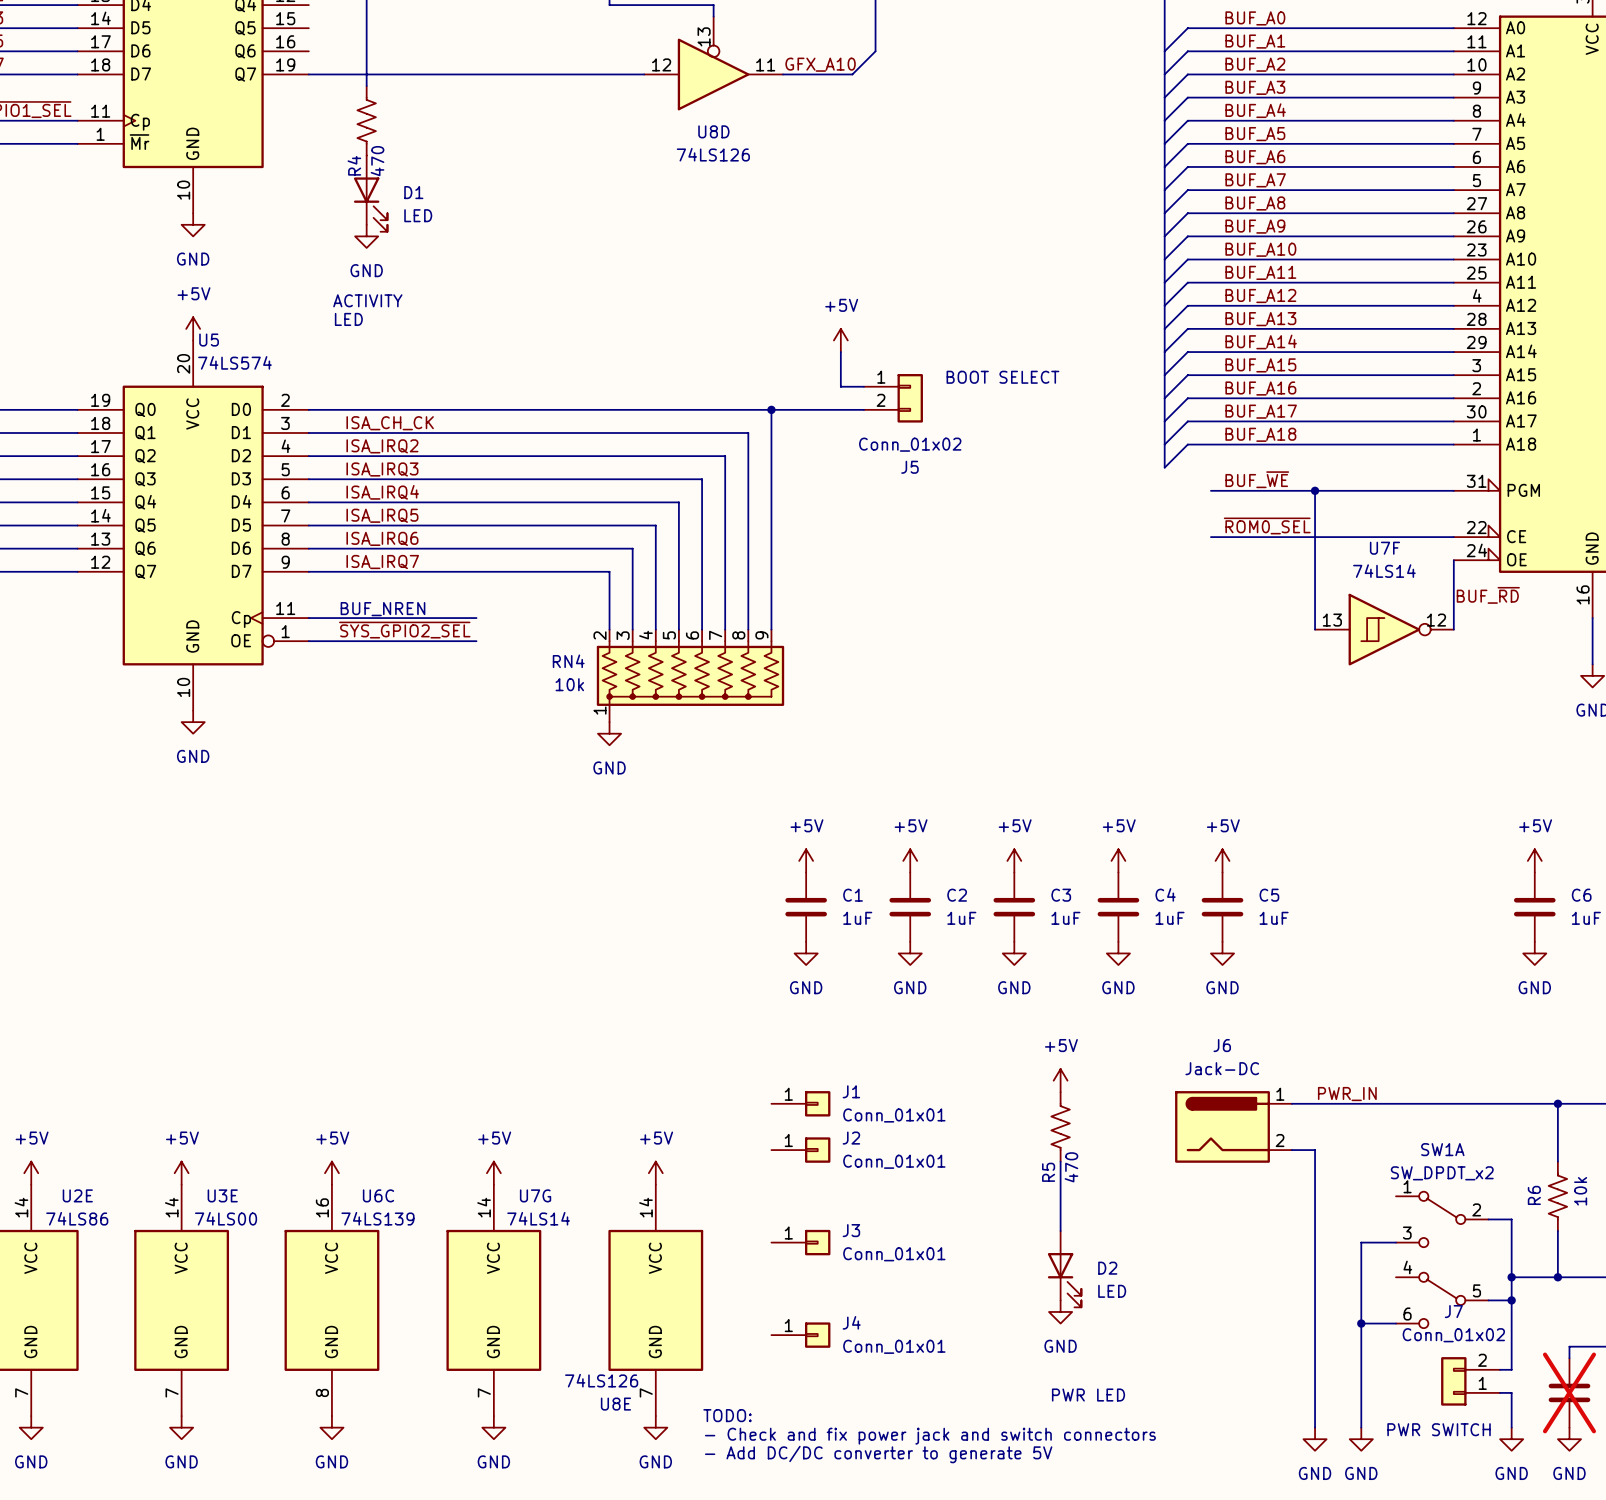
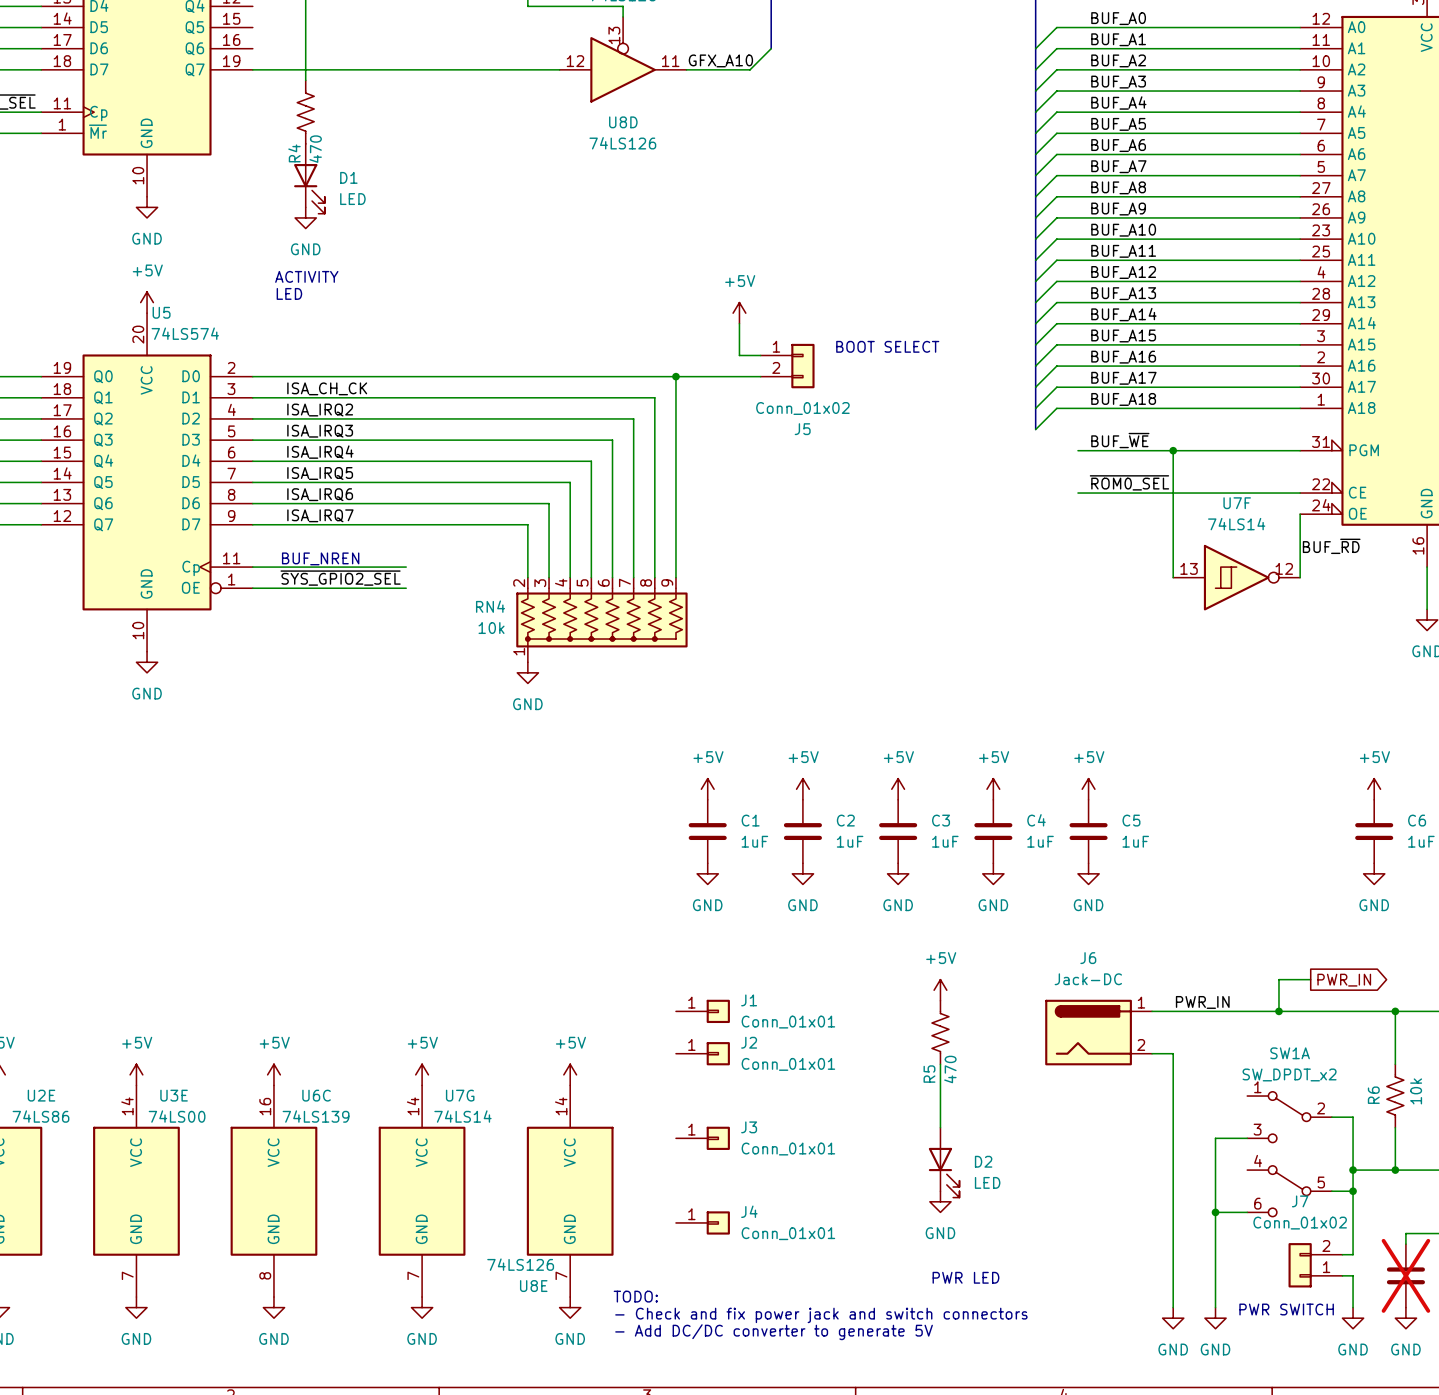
wire: none -> (1310, 979) (1278, 979) (1278, 1011)
global label: none -> PWR_IN (1344, 980)
junction: none -> (1278, 1011)

